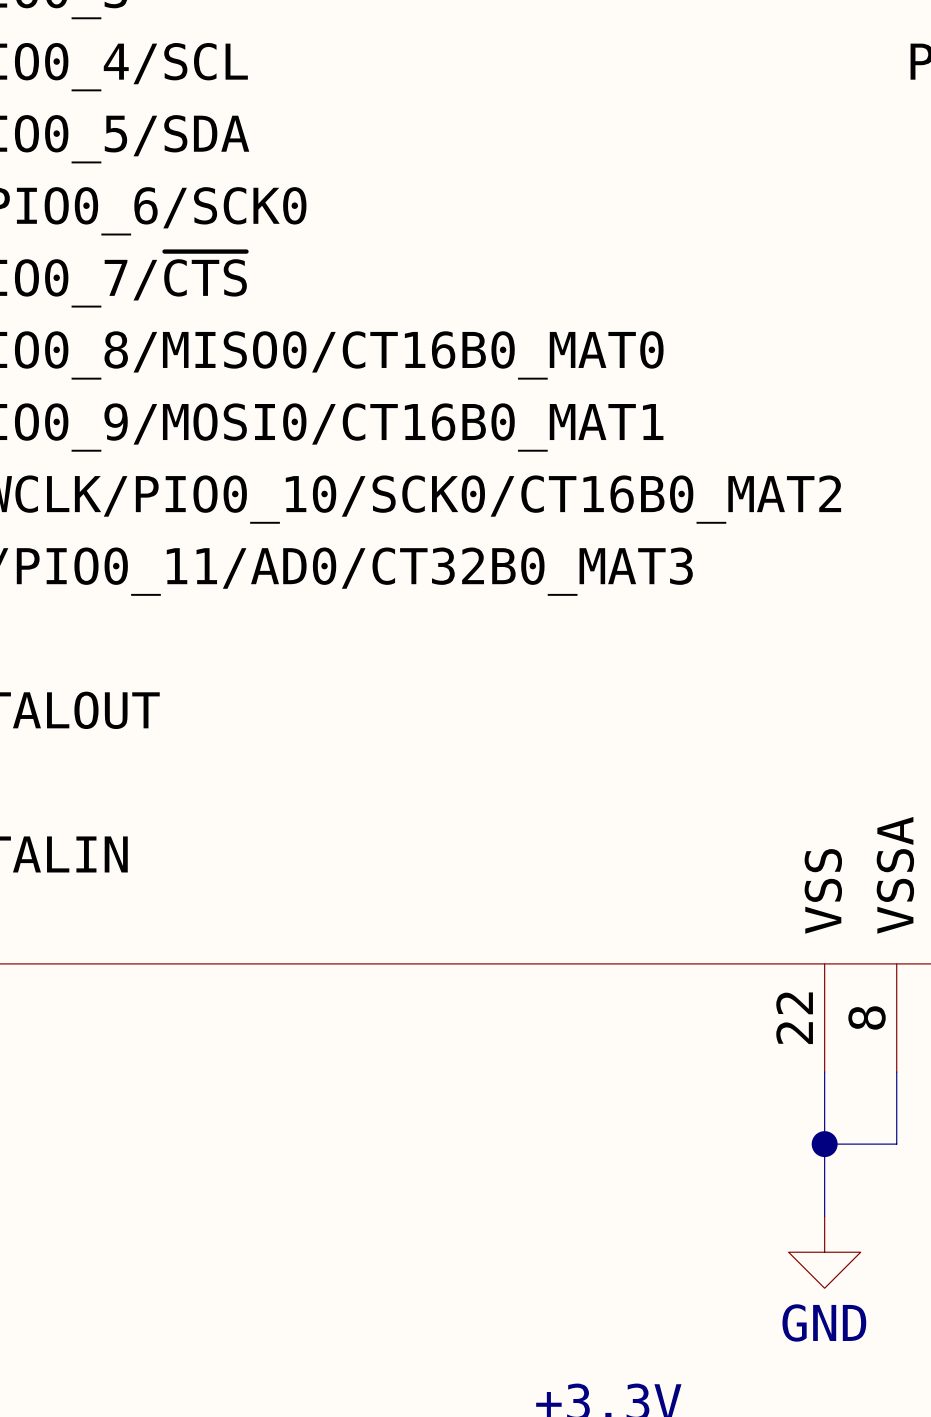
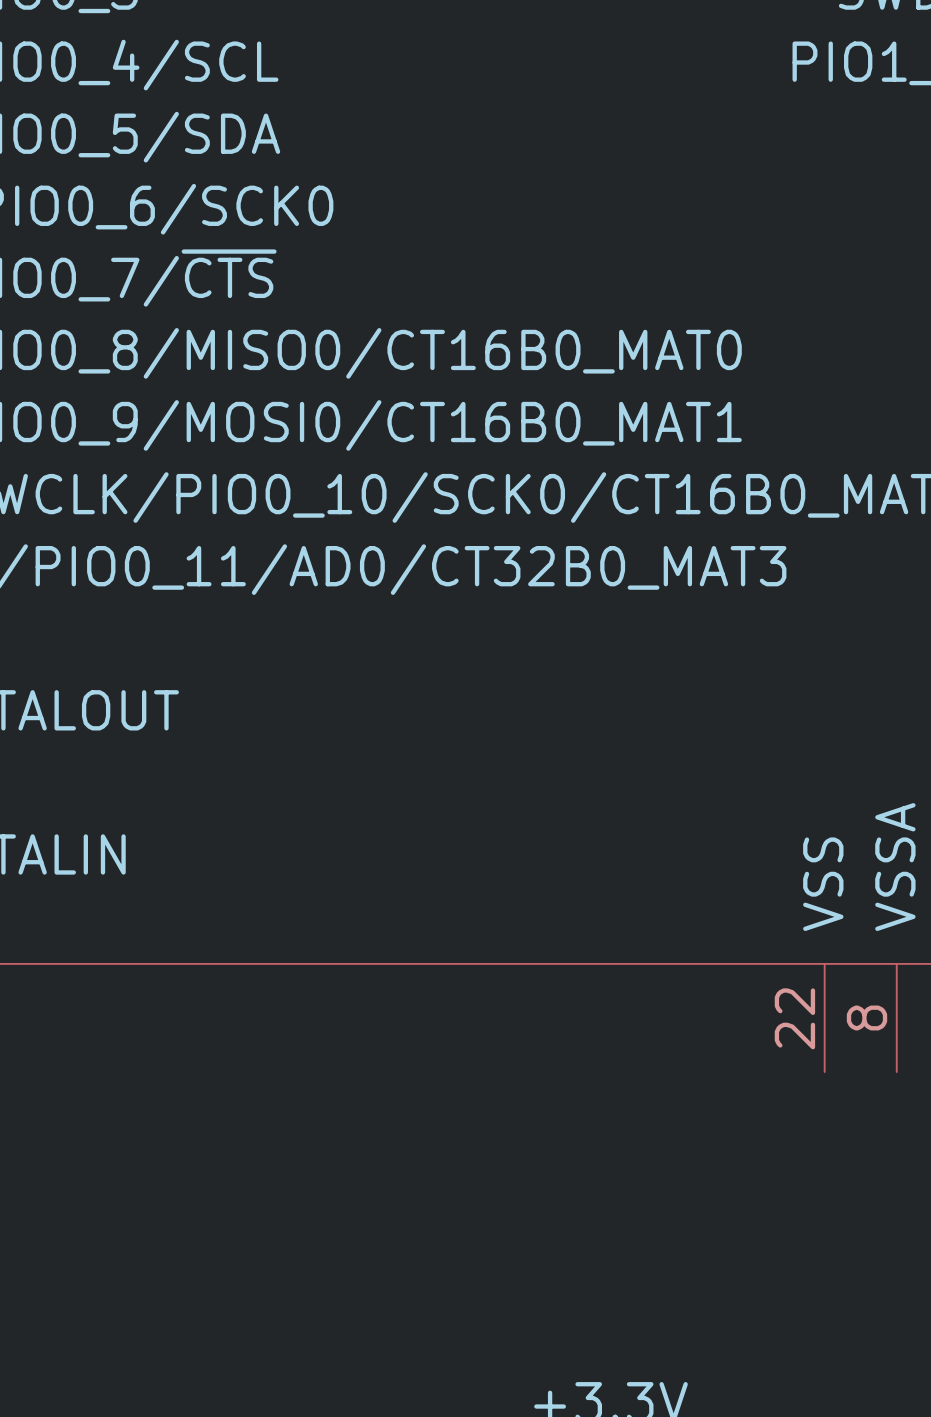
wire: (824, 1072) (824, 1216) -> none
wire: (896, 1072) (896, 1144) (824, 1144) -> none
junction: (824, 1144) -> none
power symbol: GND (824, 1252) -> none

